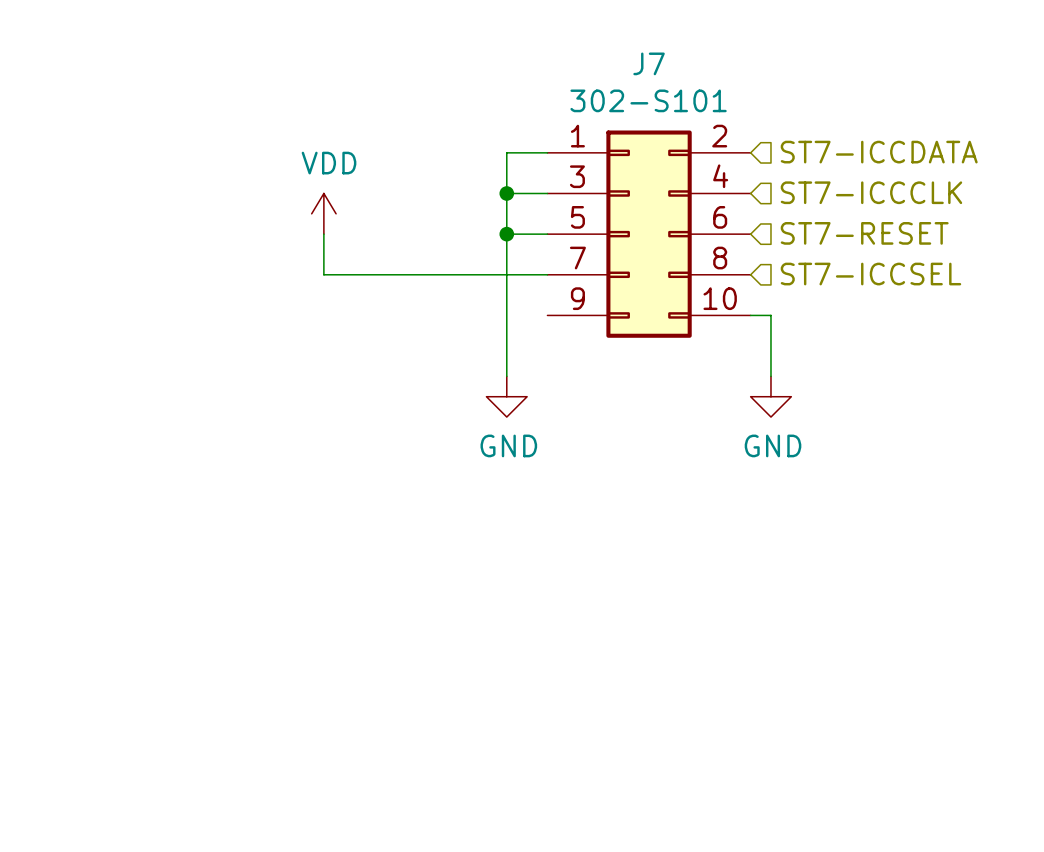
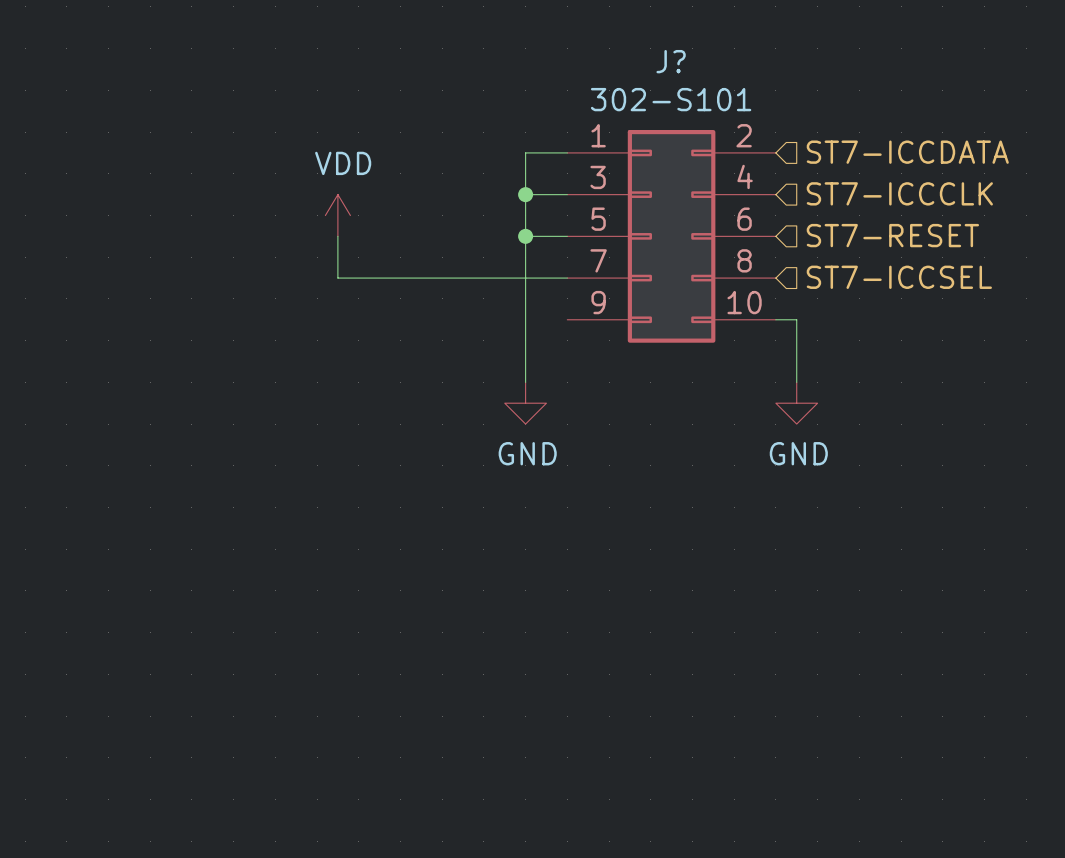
J7 name: J7 (649, 63) -> J? (671, 61)

